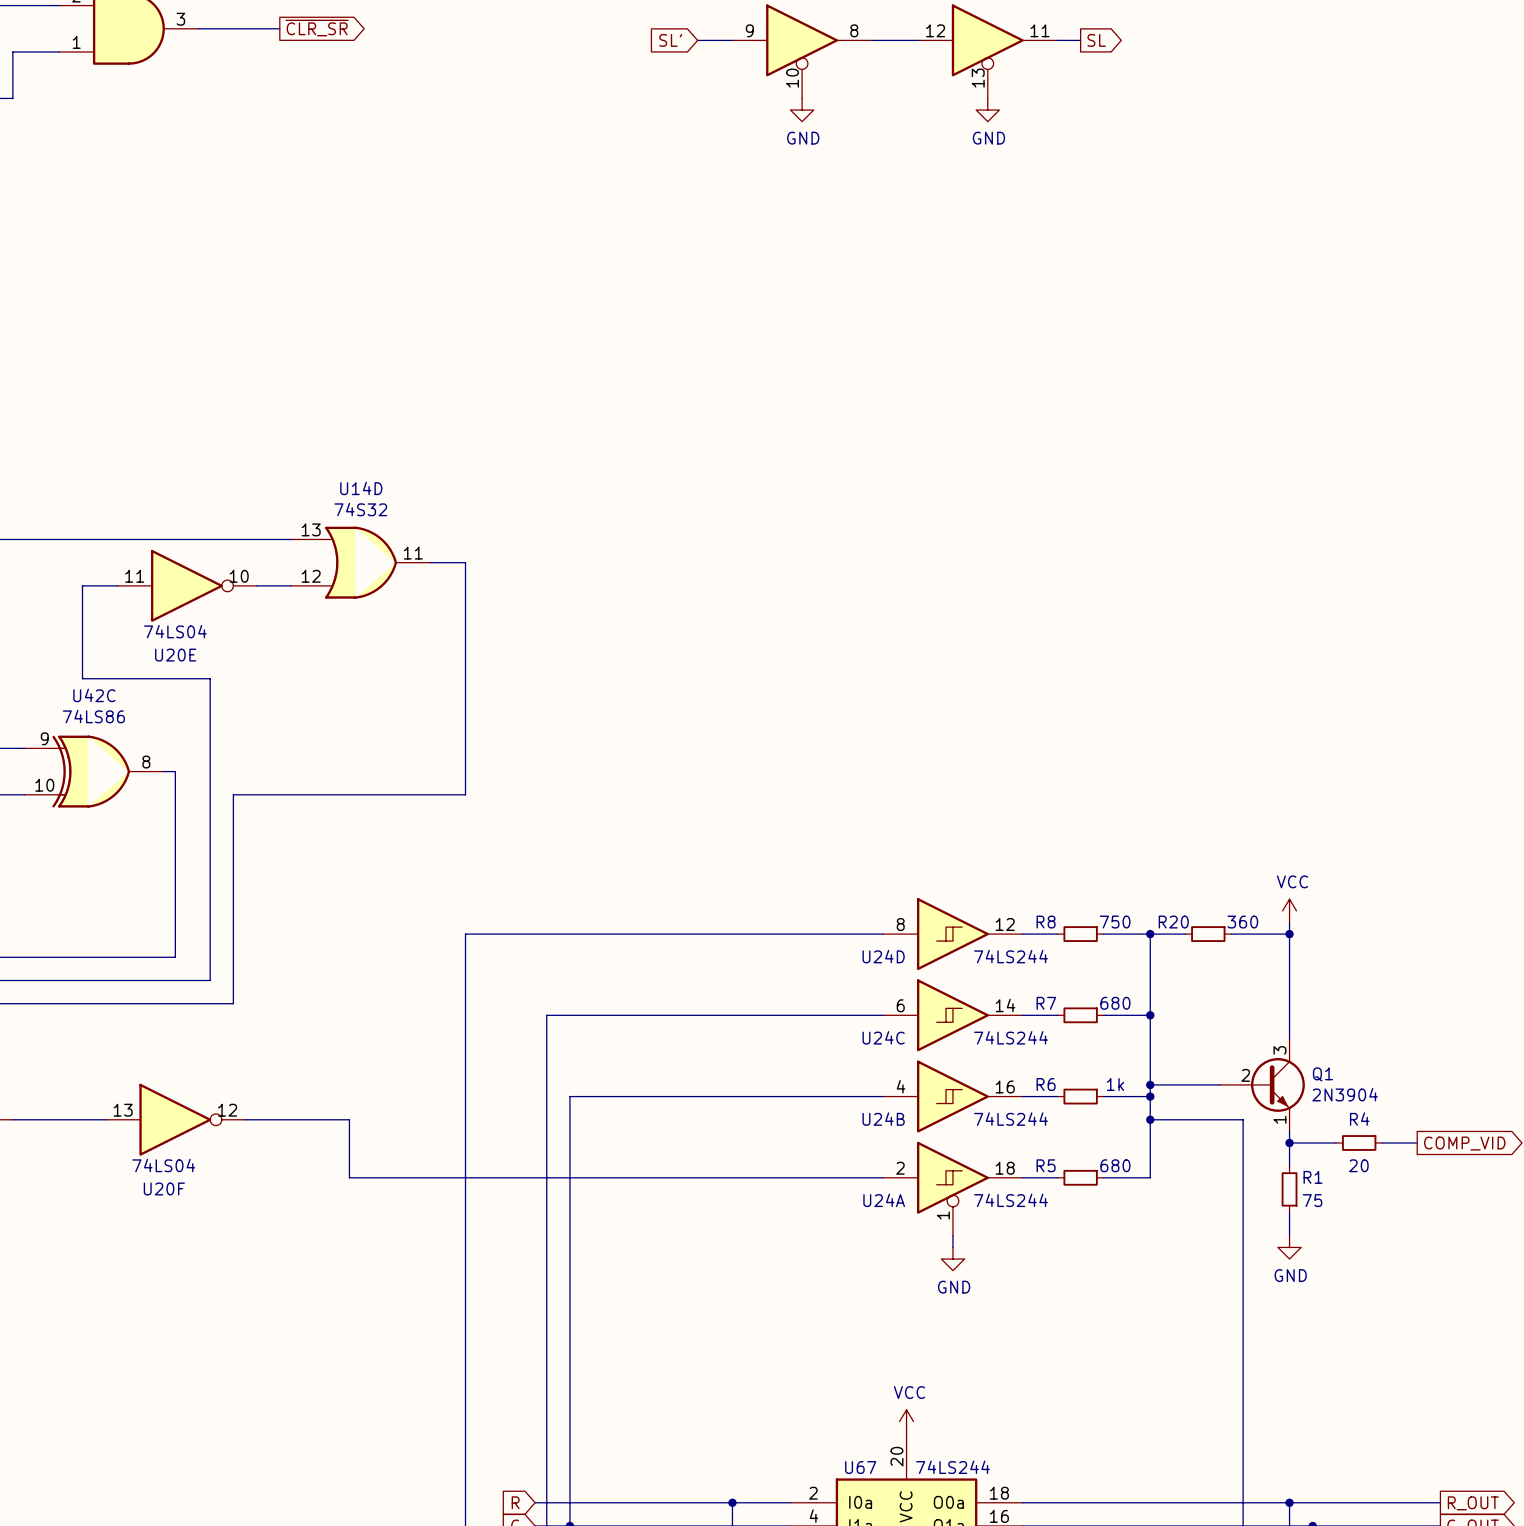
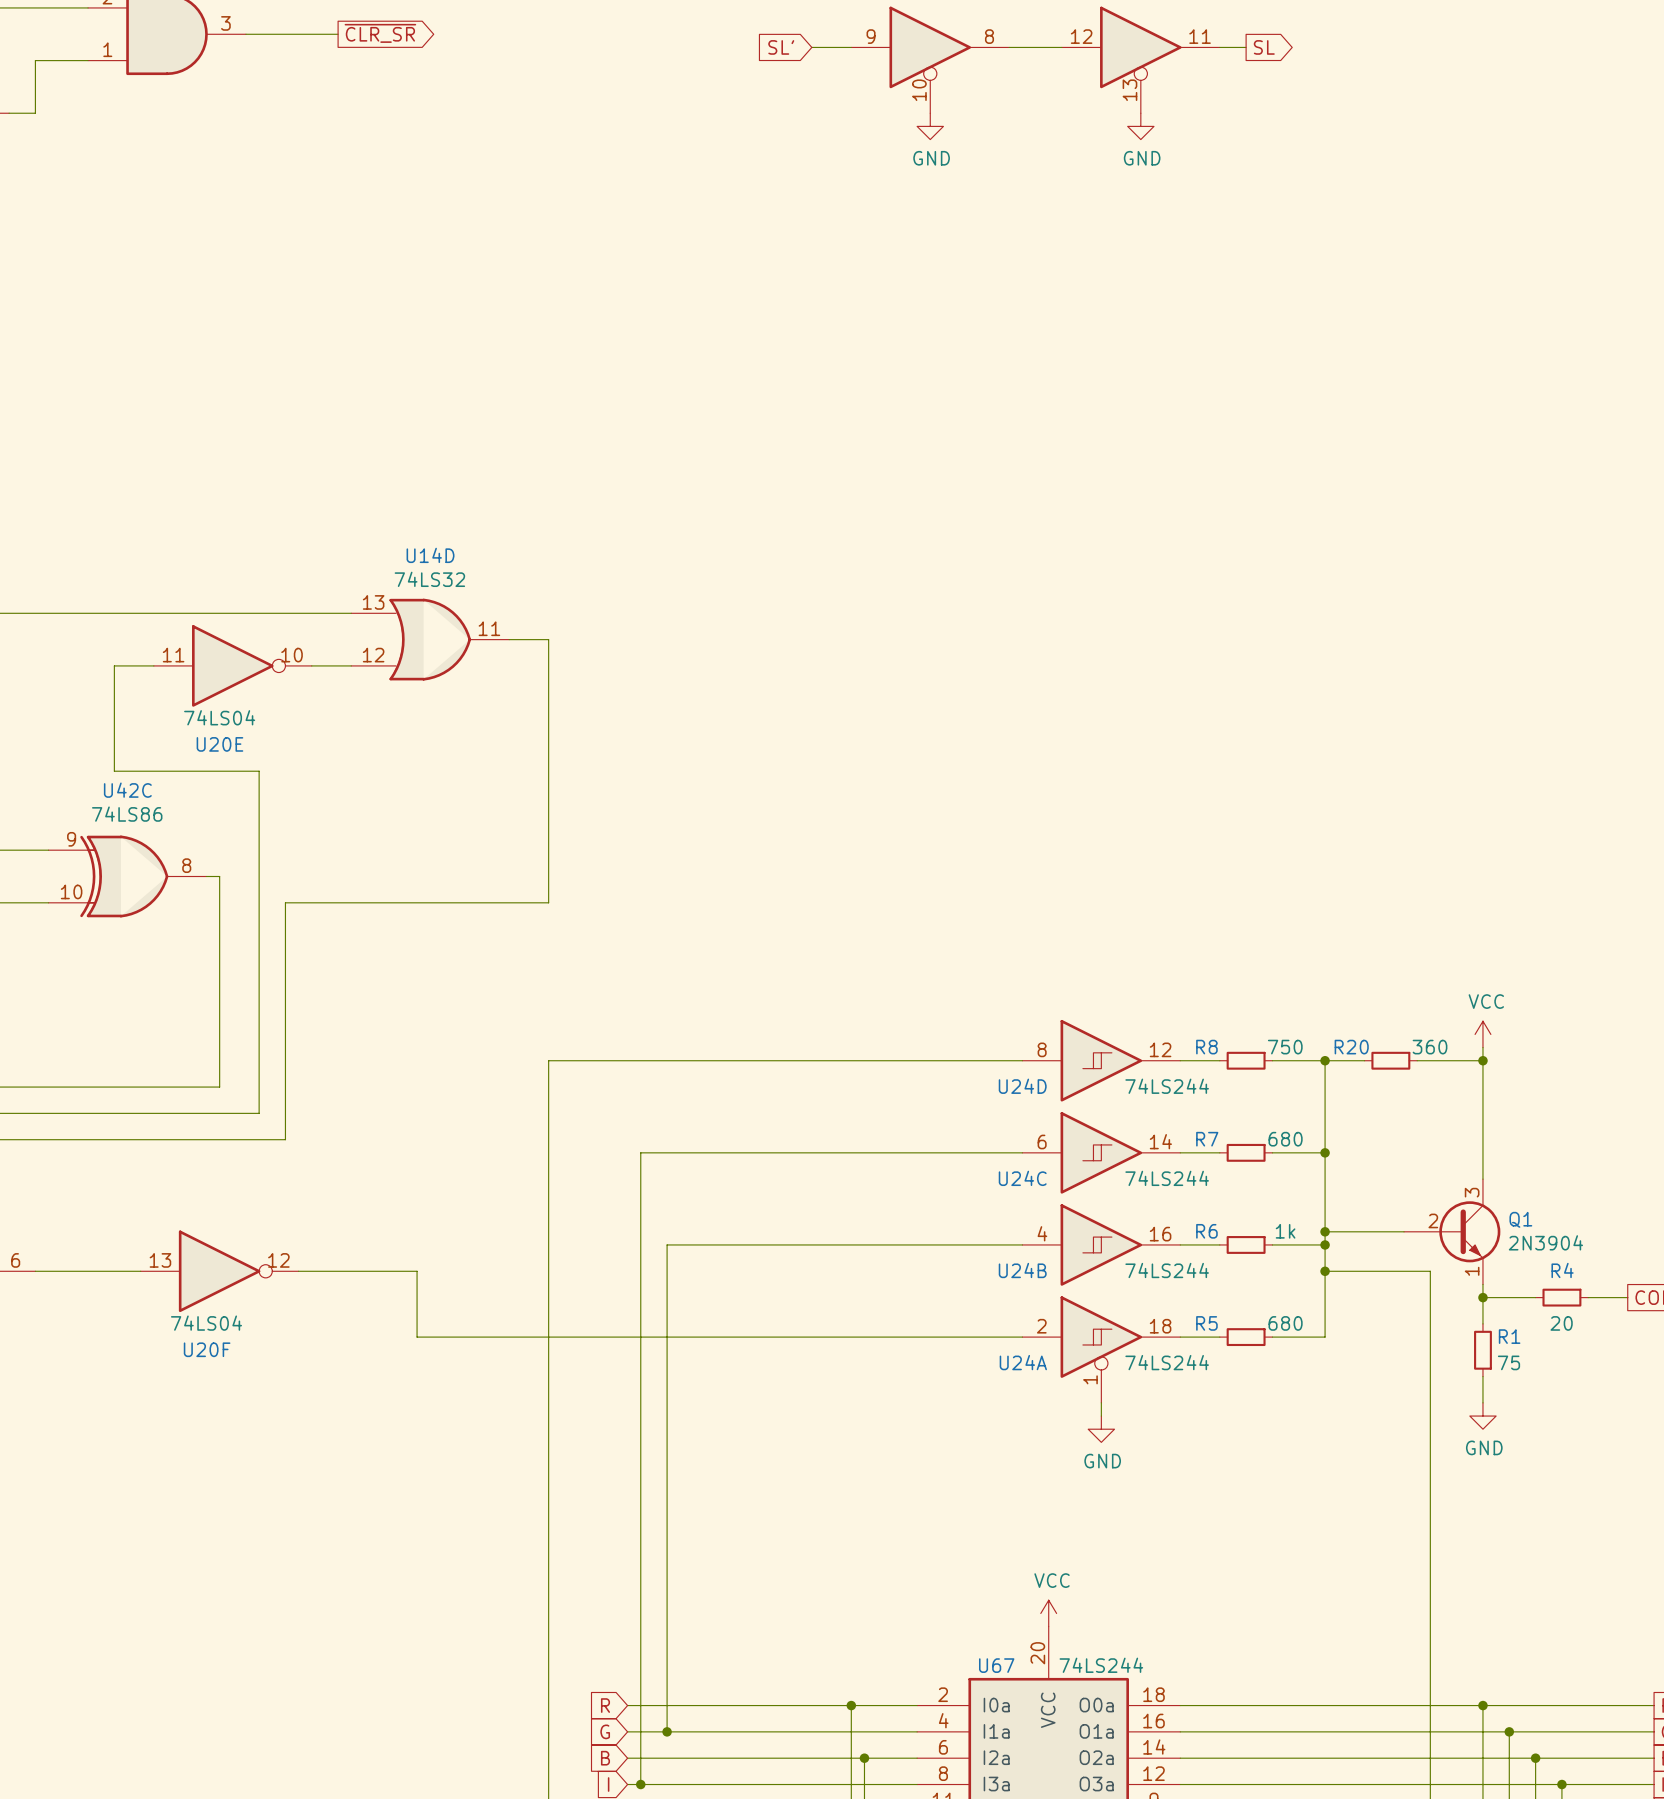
U14D value: 74S32 (360, 509) -> 74LS32 (429, 579)

